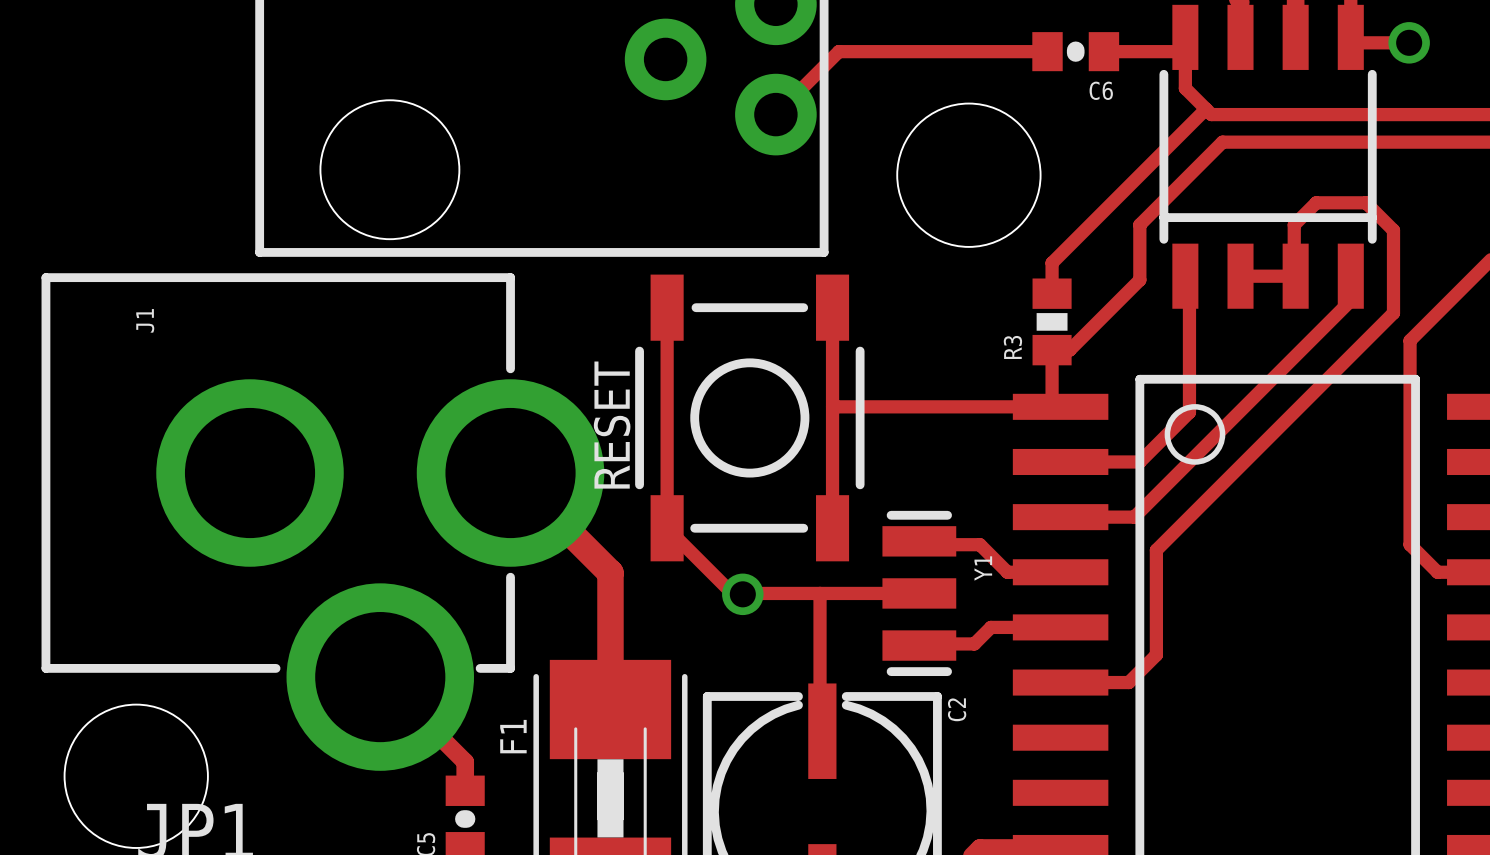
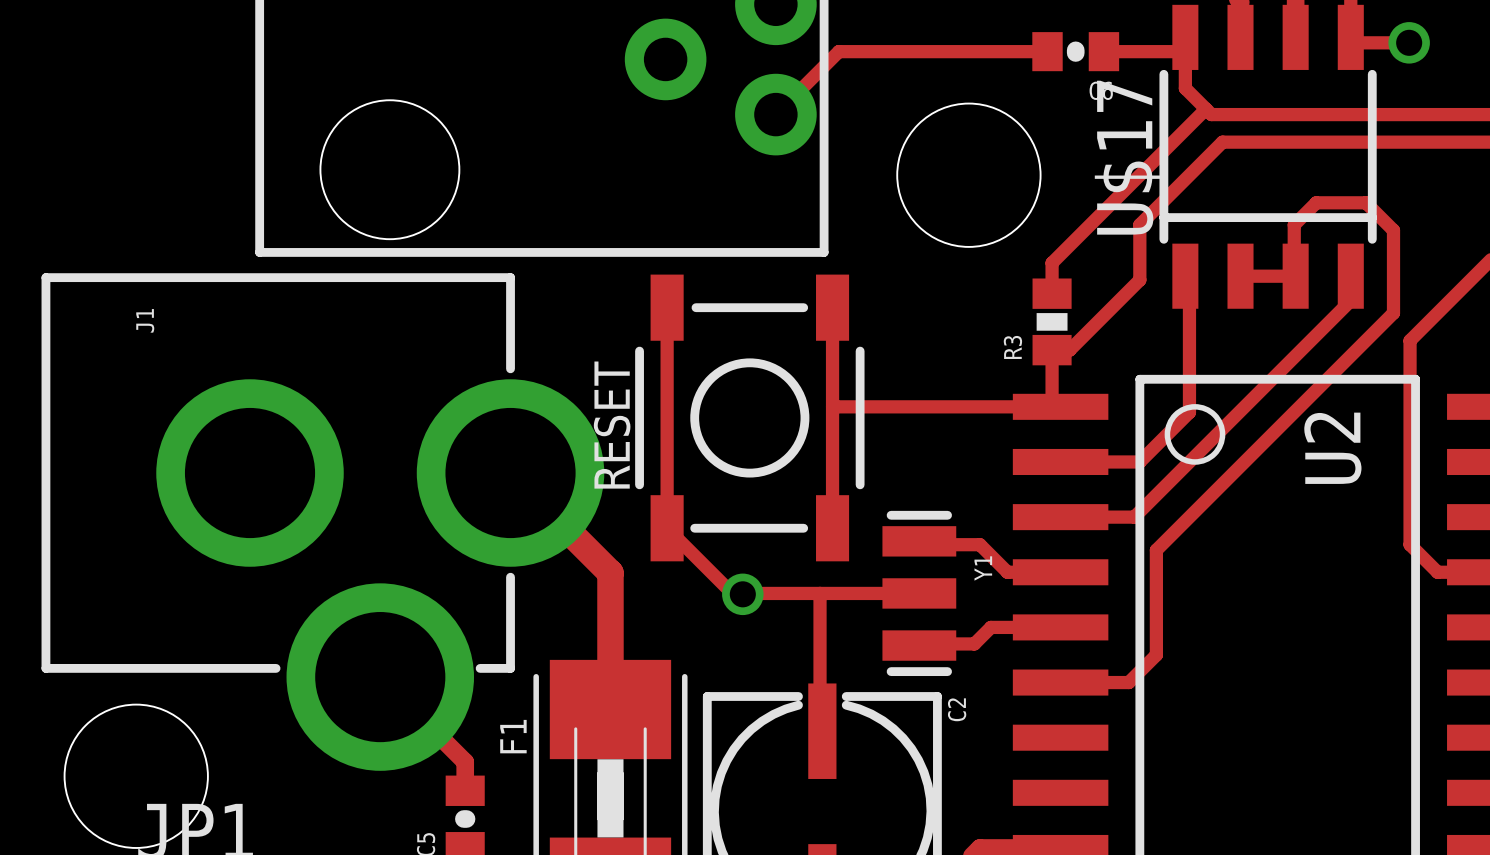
U$17 name: none -> U$17 (1129, 157)
U2 name: none -> U2 (1332, 448)

